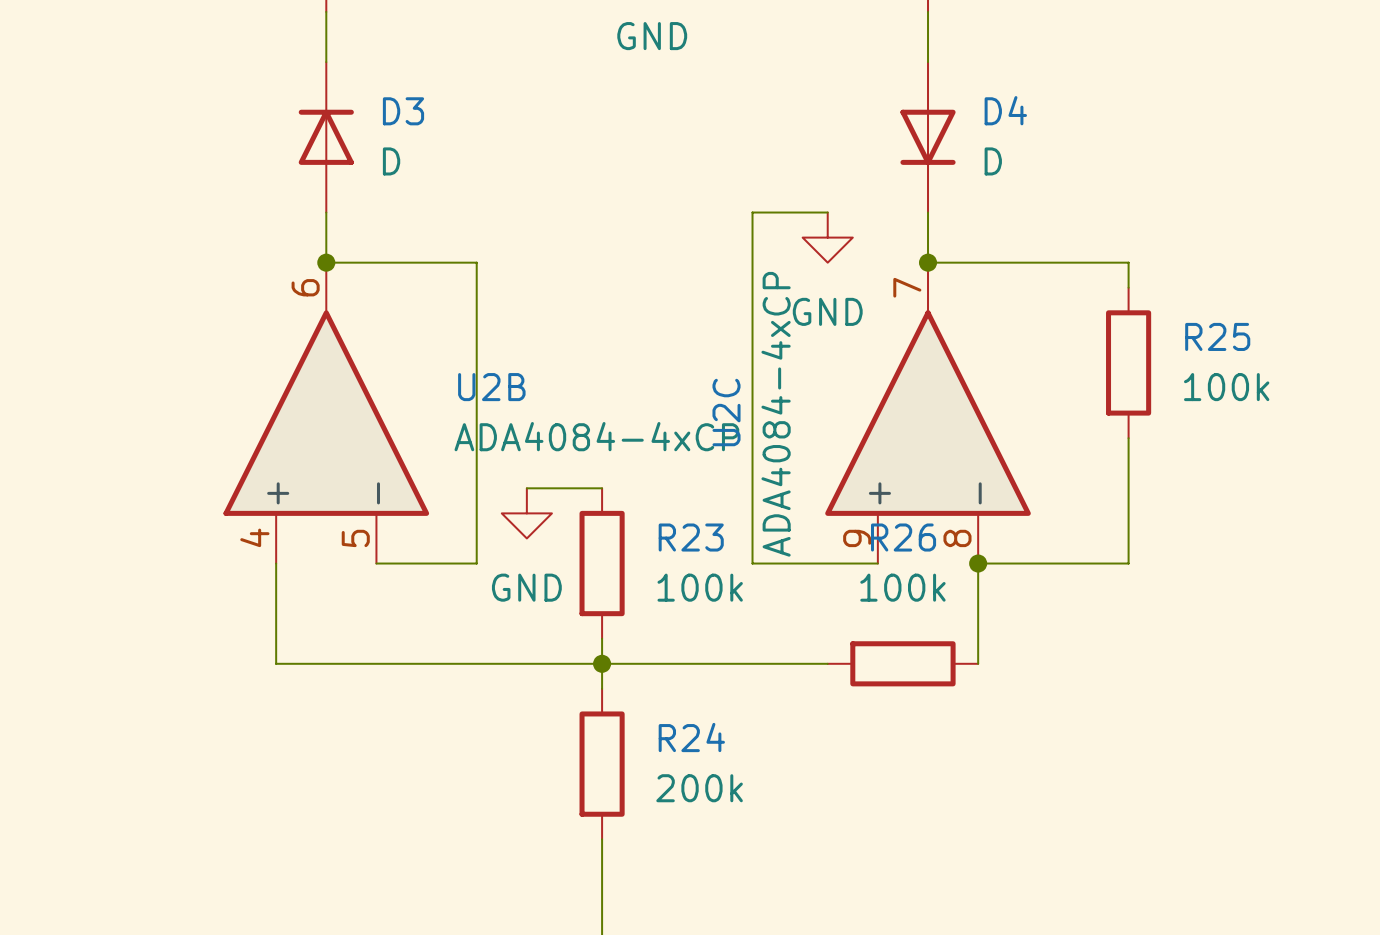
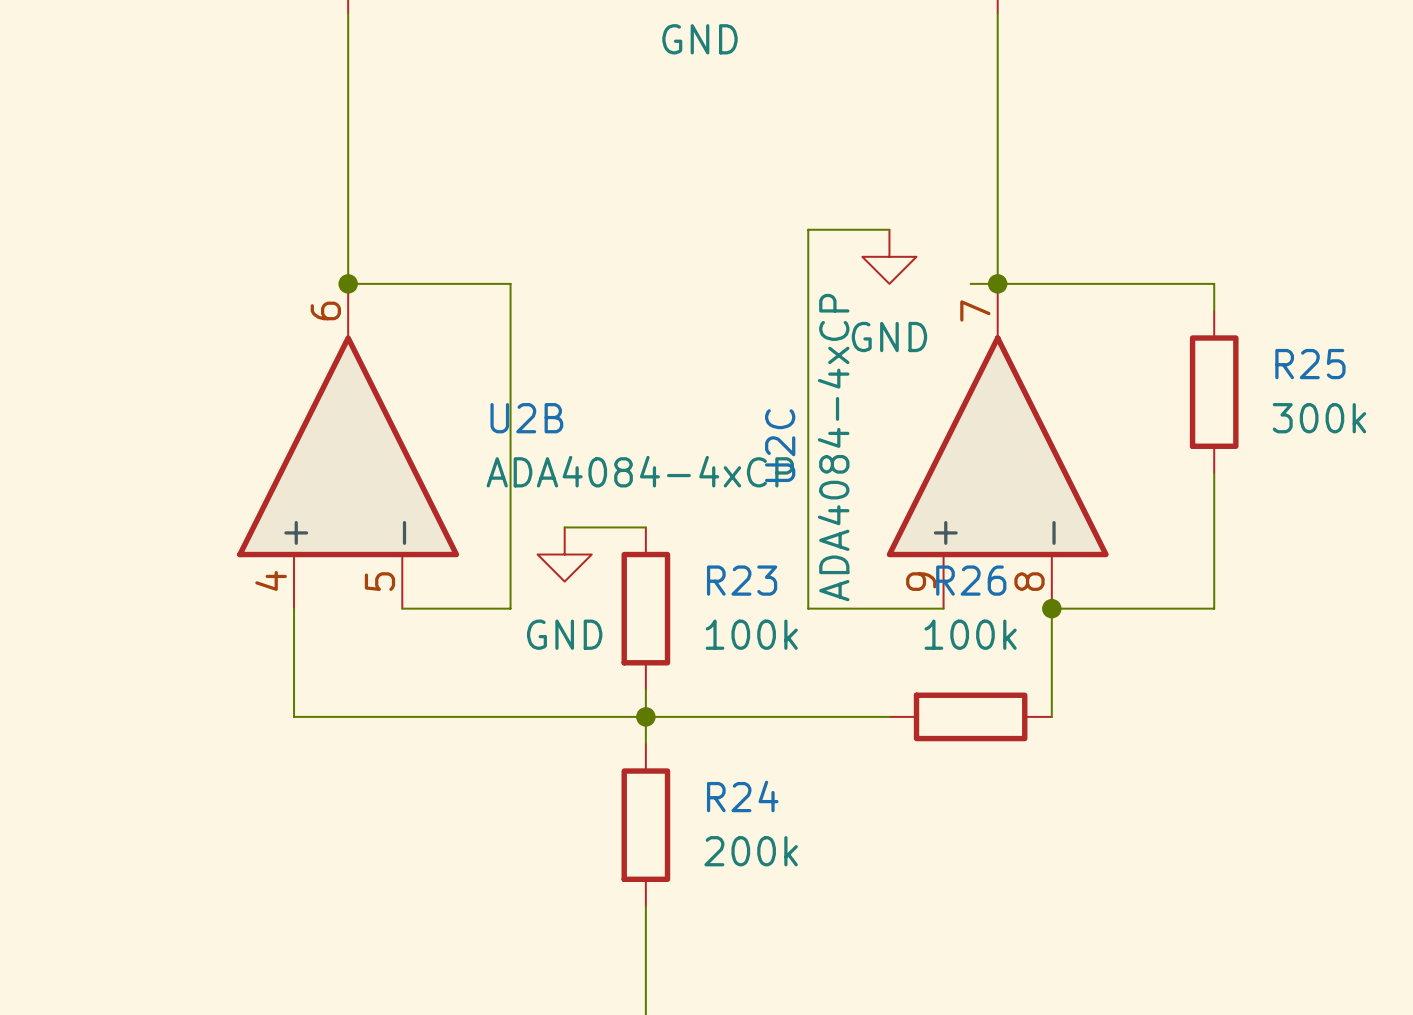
D3: D (326, 137) -> none
D4: D (928, 137) -> none
wire: none -> (970, 283) (997, 283)
R25 value: 100k (1226, 387) -> 300k (1319, 418)

